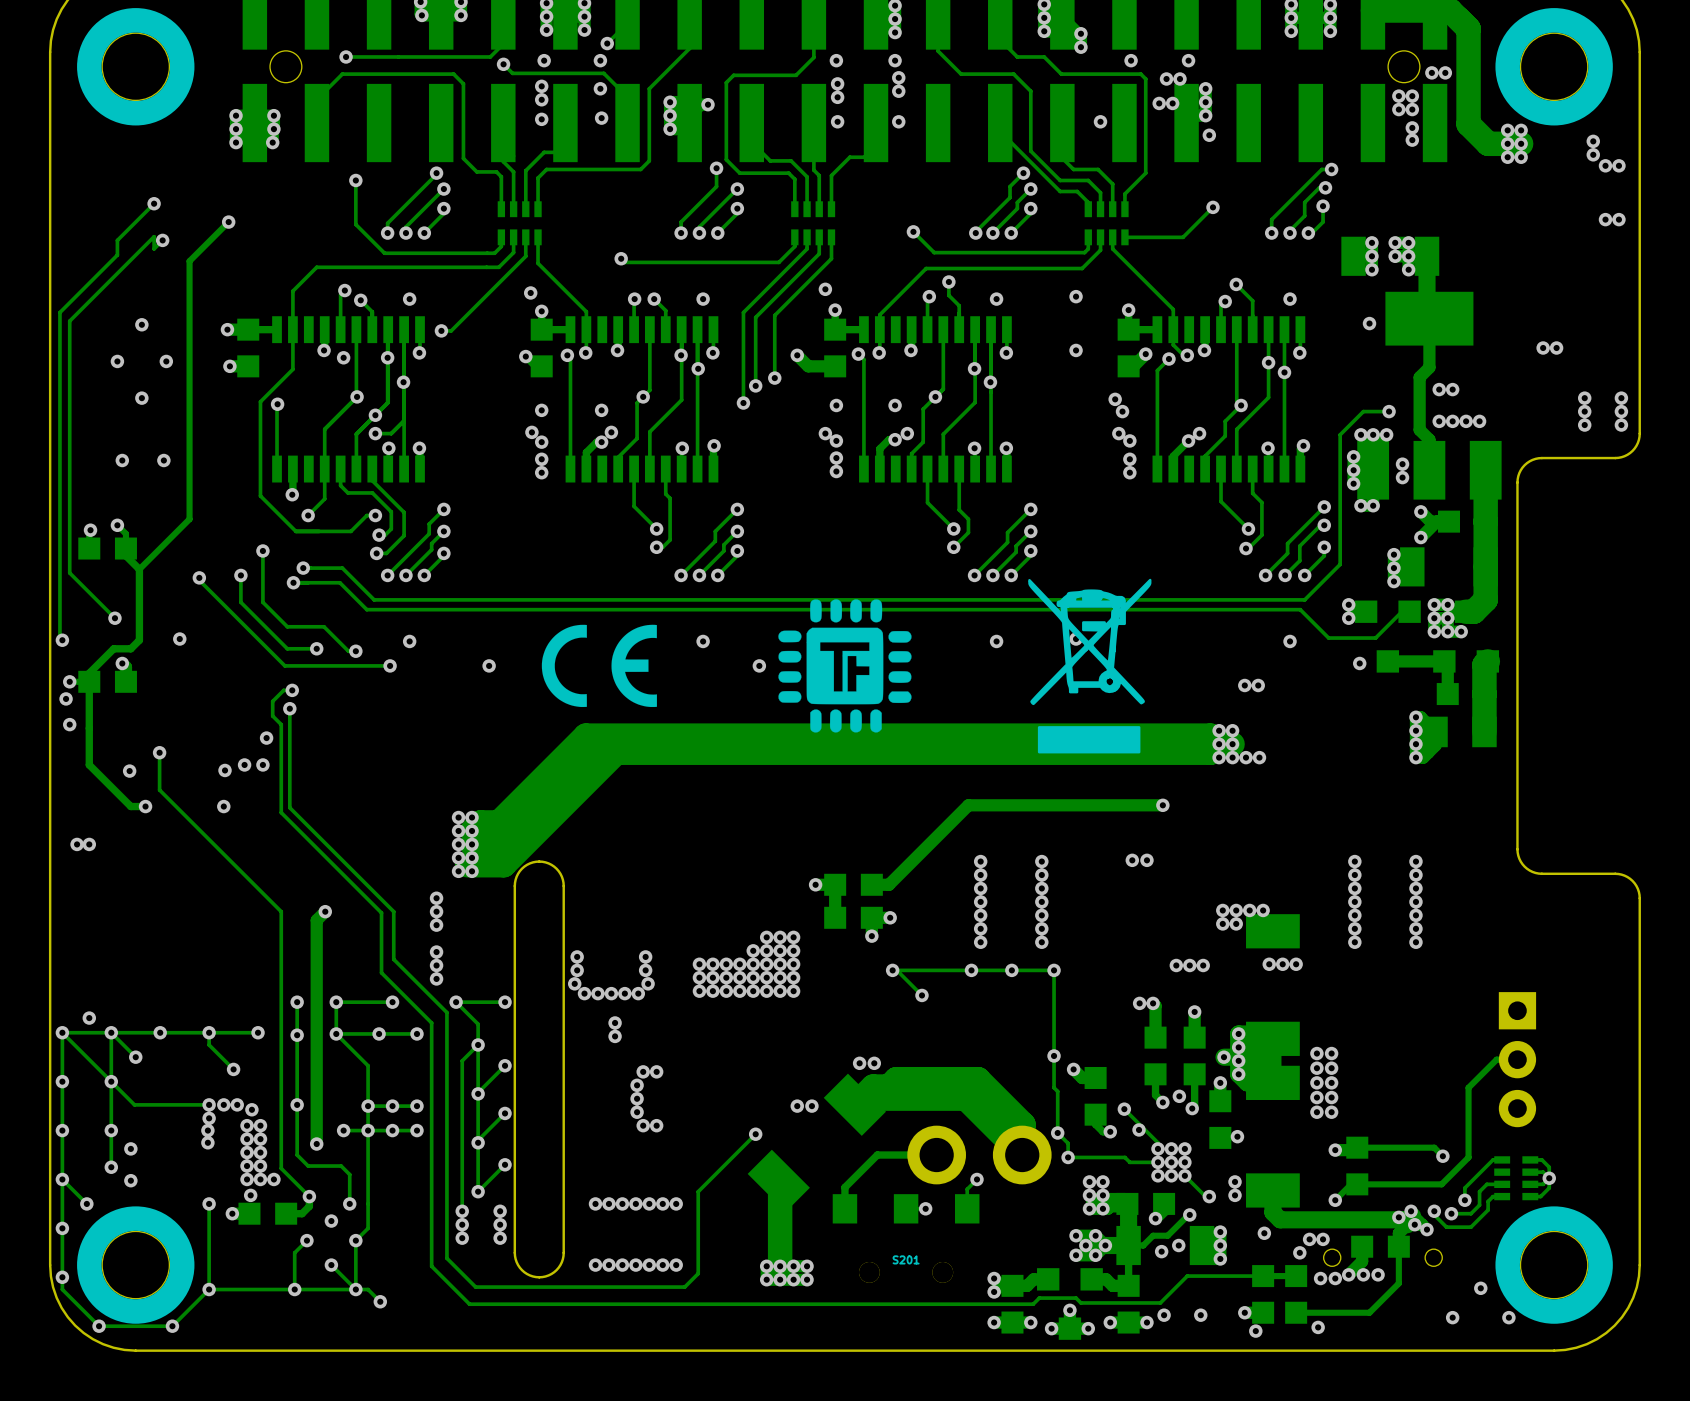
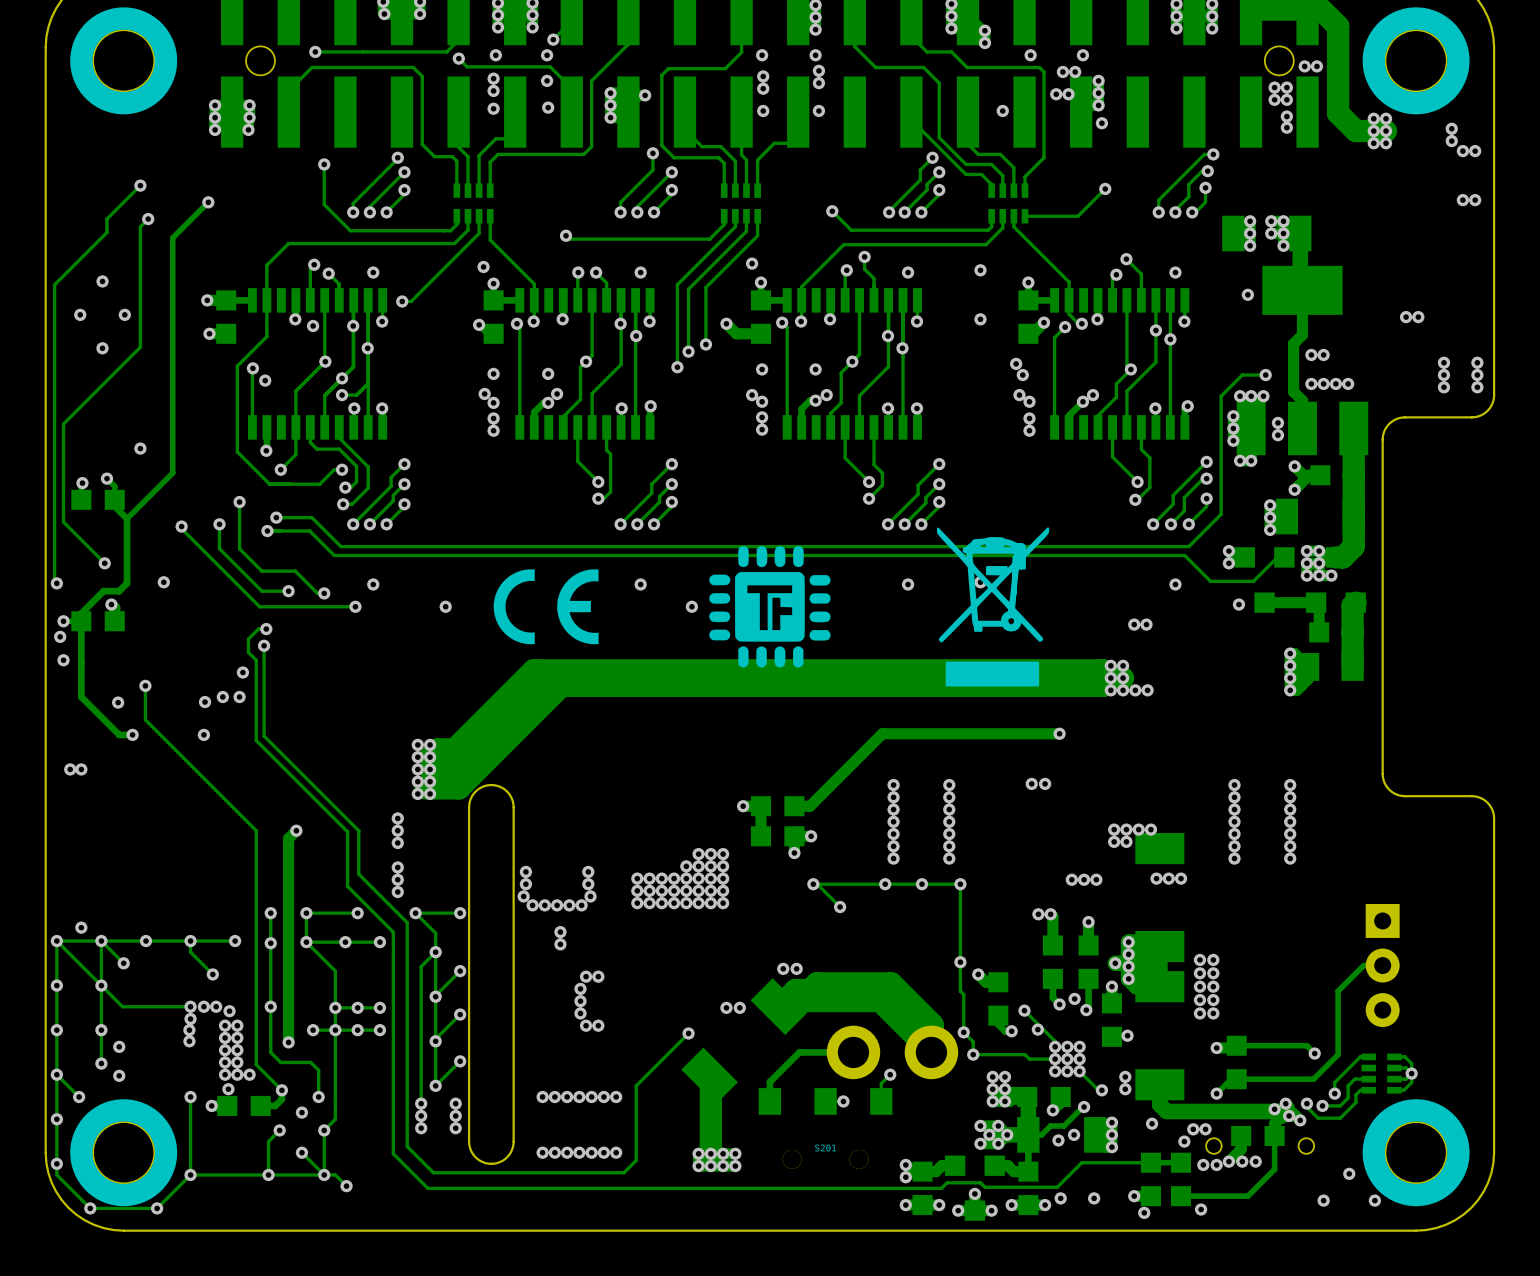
track: (154, 248) (154, 236) (69, 321) (69, 465) -> (140, 226) (140, 347) (63, 424)
via: none -> (102, 281)
via: (141, 324) -> none
via: none -> (80, 314)
via: none -> (124, 314)
via: (117, 361) -> none
via: (166, 361) -> none
via: none -> (102, 348)
via: (141, 398) -> none
via: none -> (265, 380)
via: (122, 460) -> none
via: (163, 460) -> none
via: none -> (140, 448)

